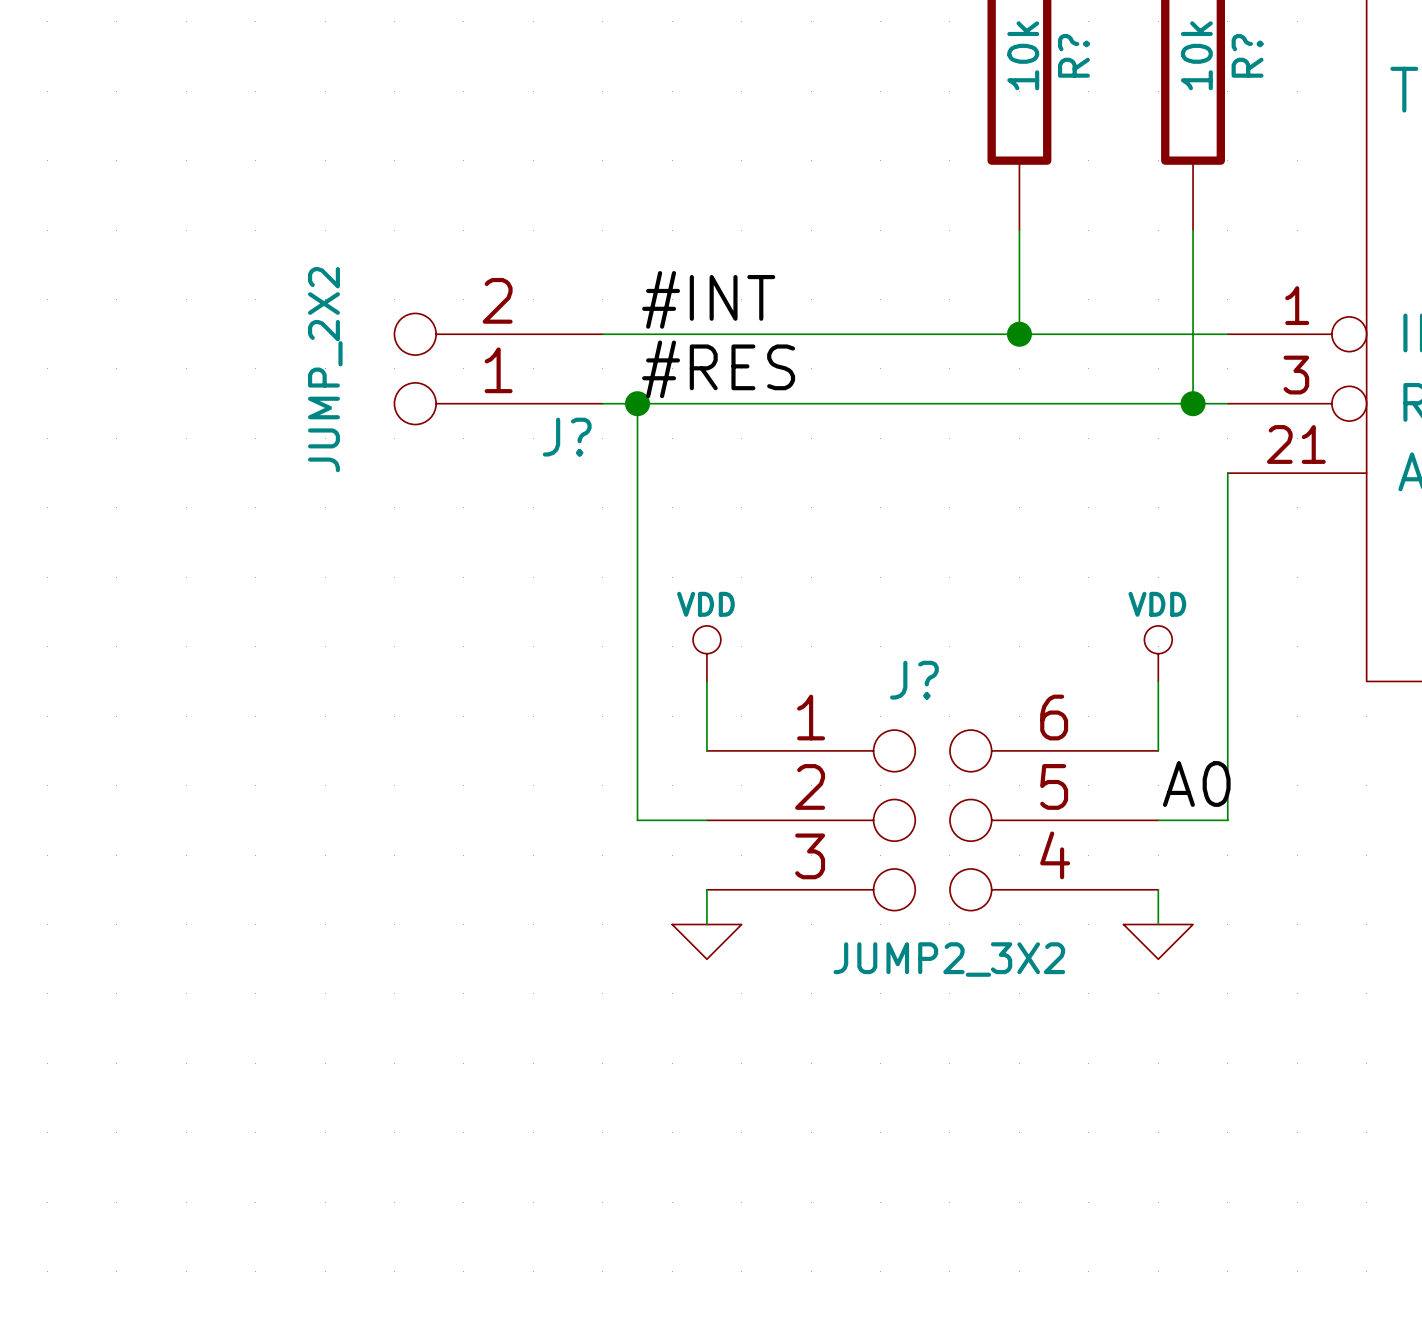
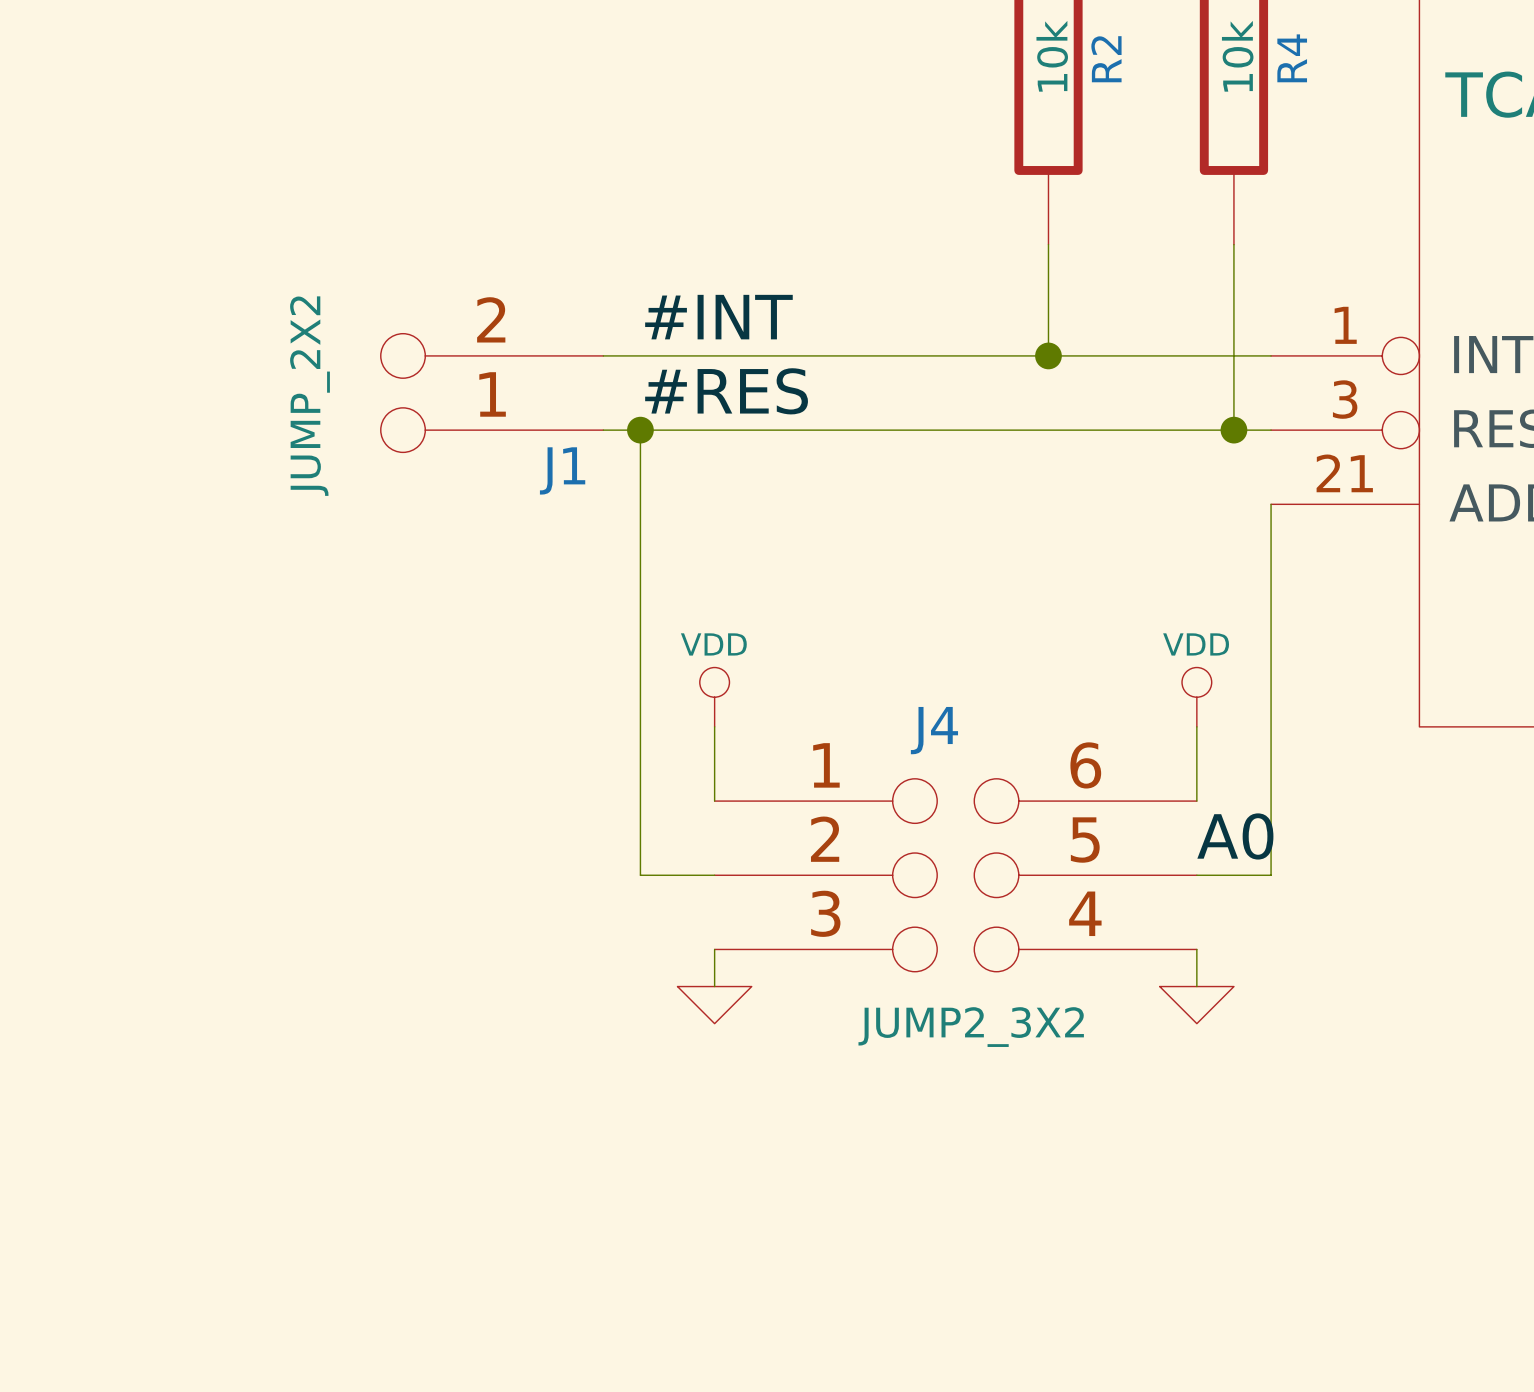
R? name: R? (1073, 55) -> R2 (1106, 59)
R? name: R? (1247, 55) -> R4 (1292, 58)
J? name: J? (567, 437) -> J1 (562, 470)
J? name: J? (914, 680) -> J4 (934, 730)

